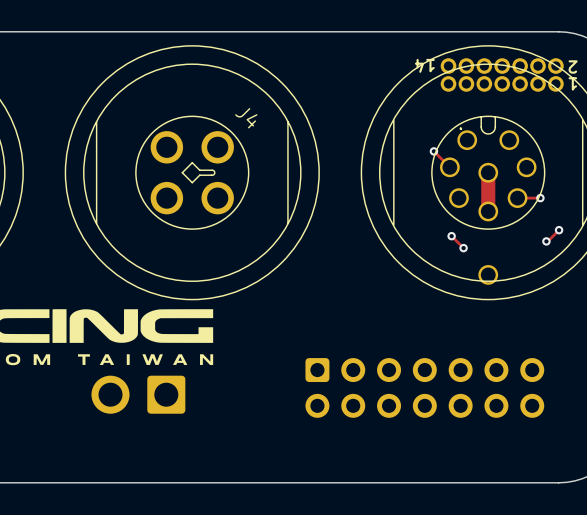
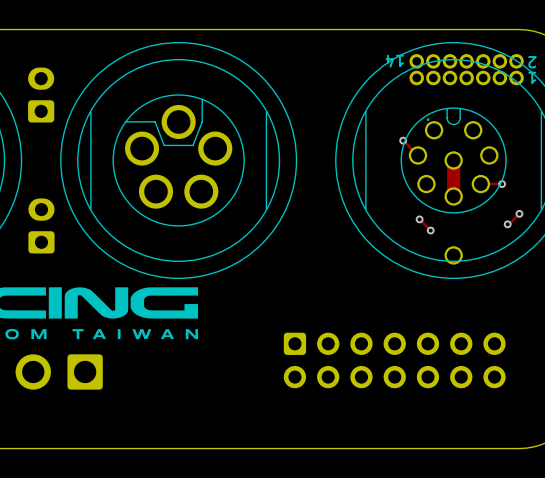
part: none -> (41, 95)
J4: (192, 172) -> none
part: none -> (178, 160)
part: none -> (41, 225)
part position: (138, 394) -> (59, 371)

